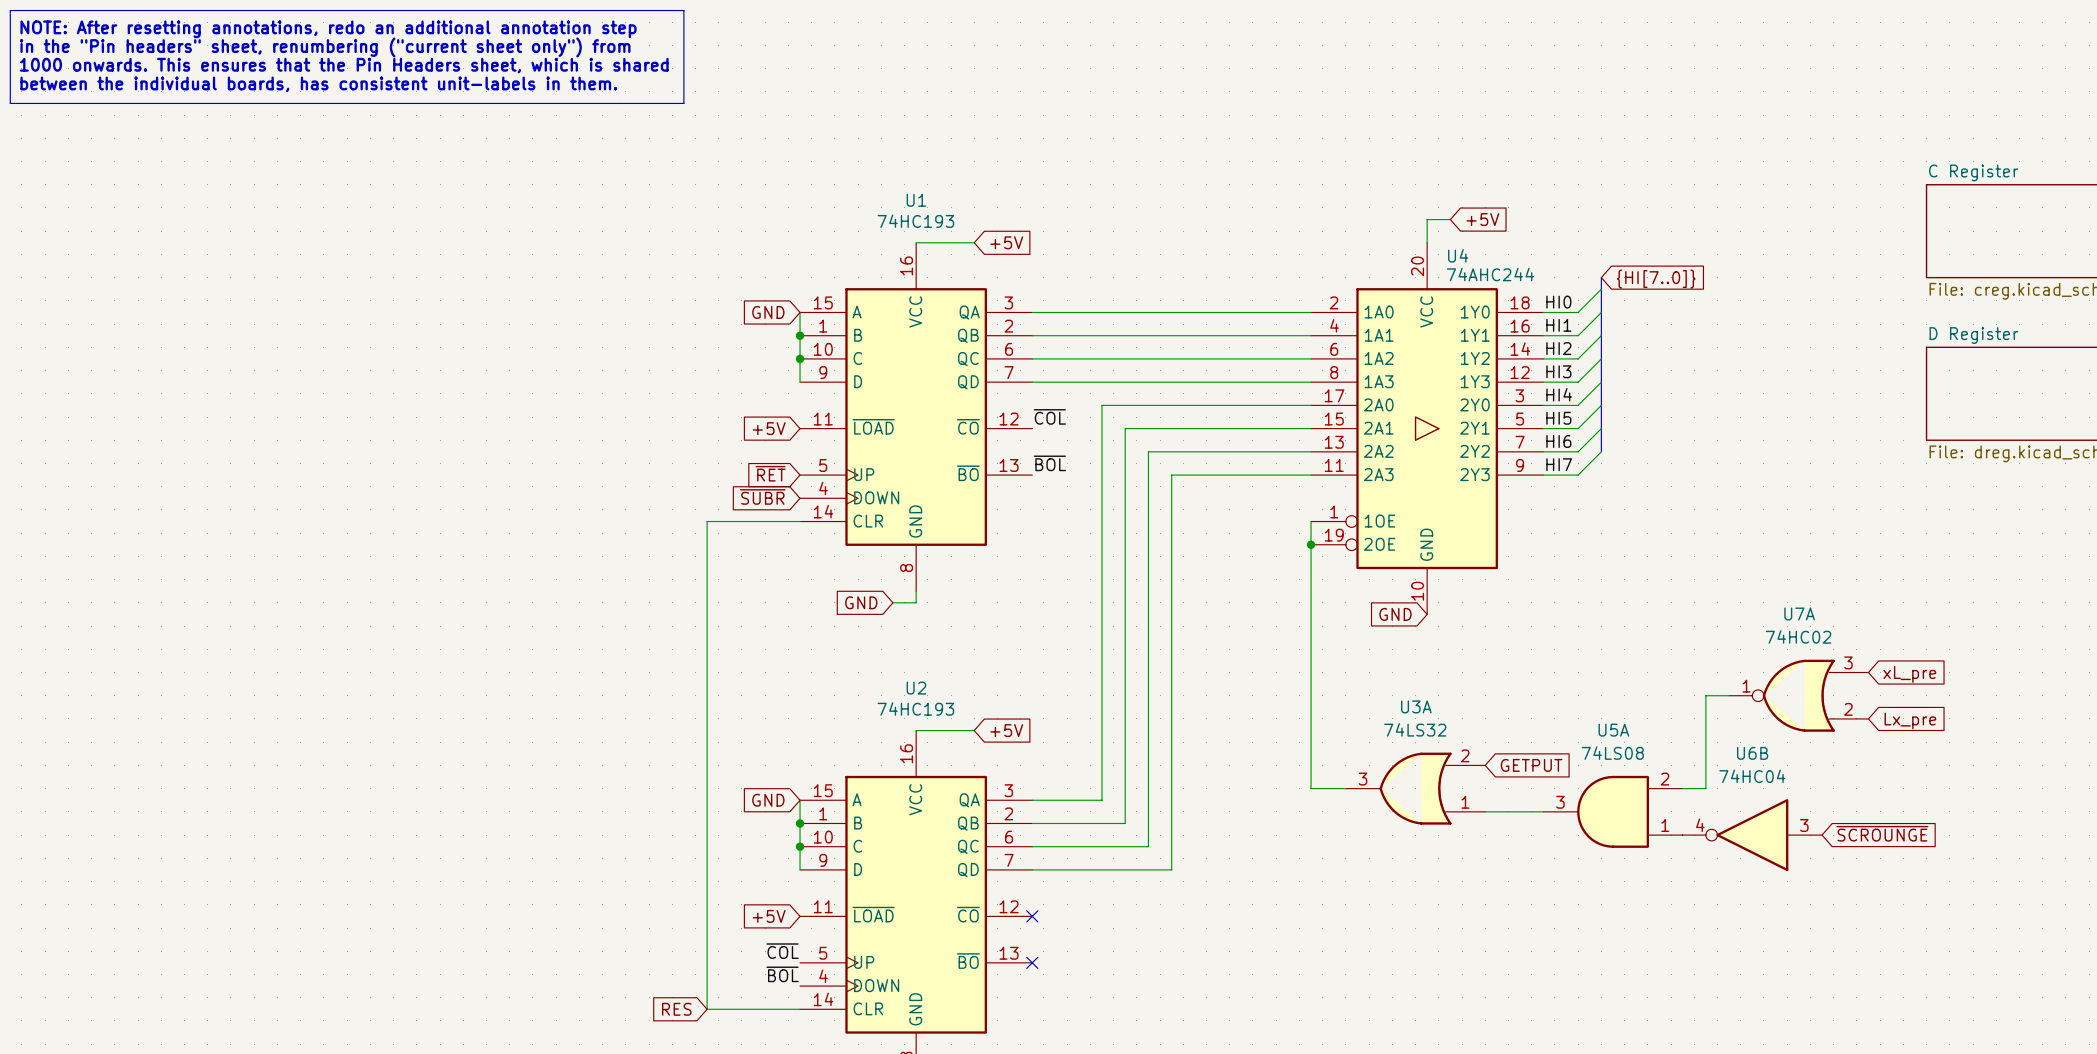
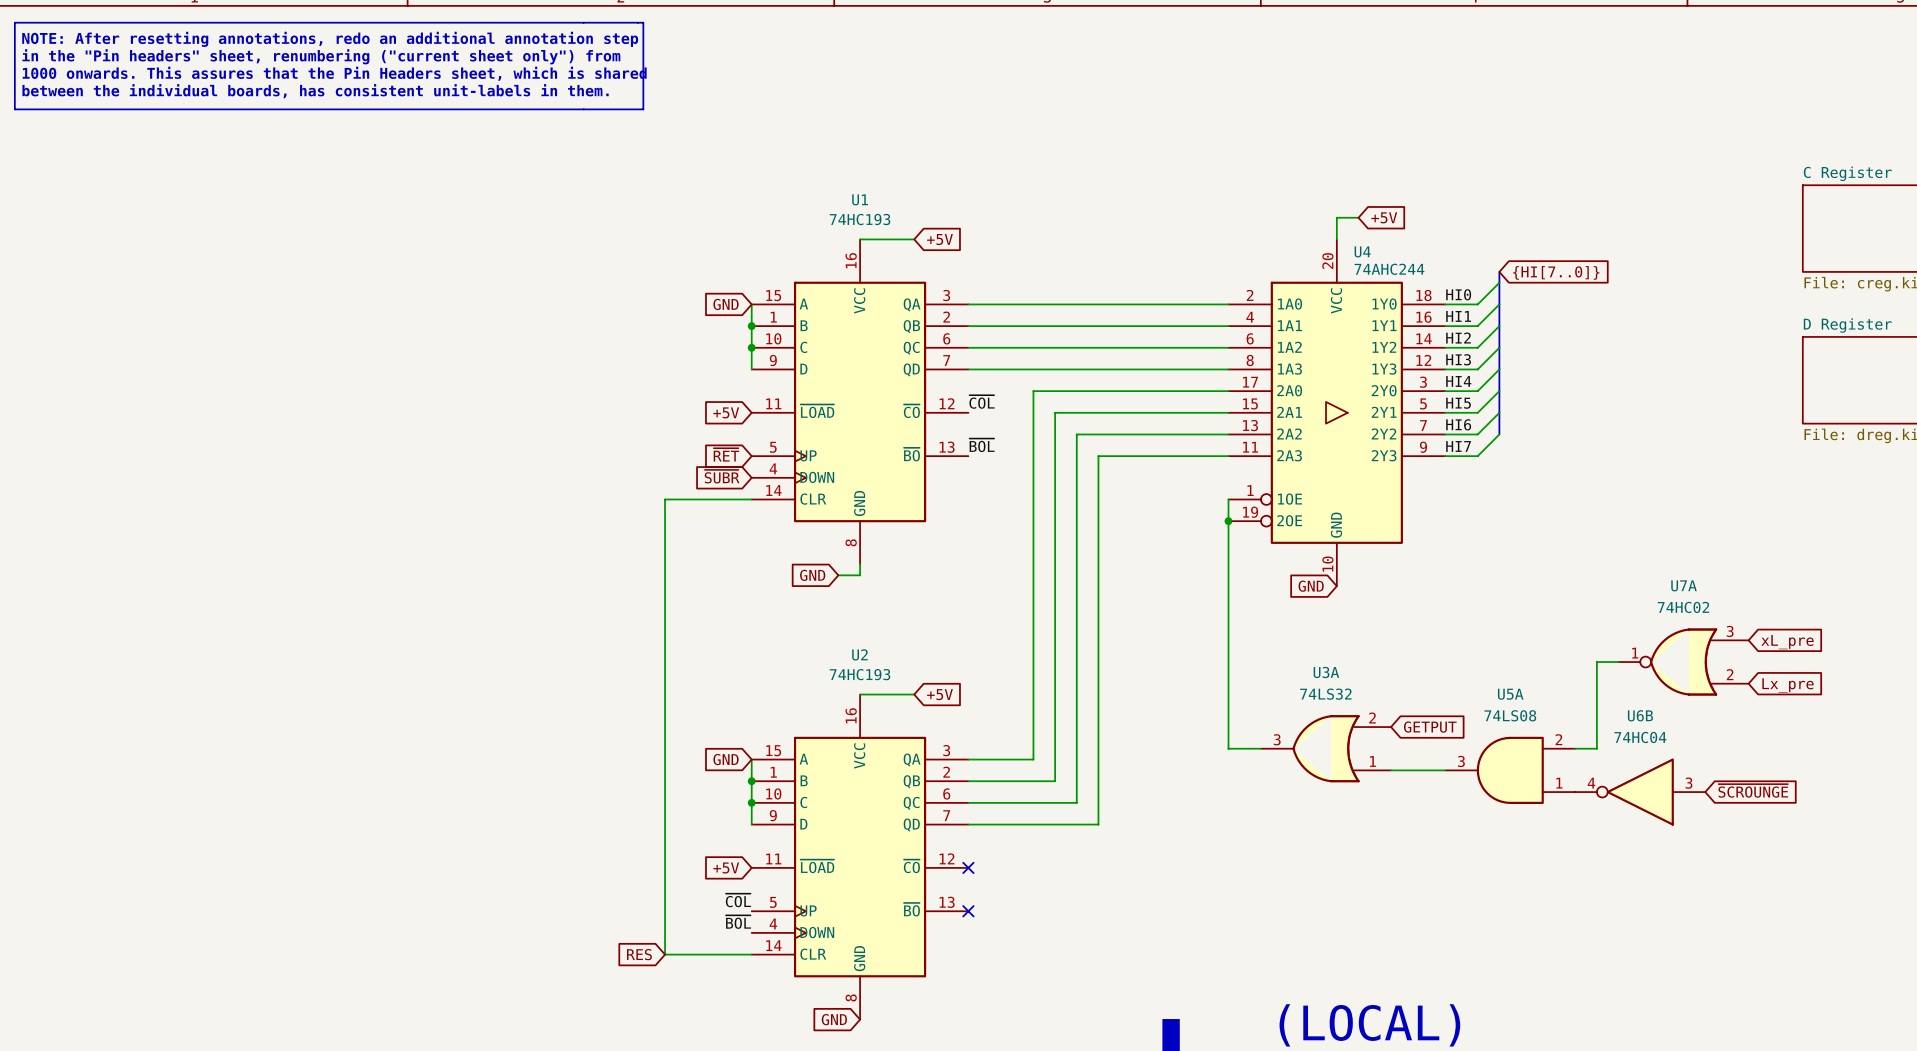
text: 1000 onwards. This ensures that the Pin Headers sheet, which is shared (344, 65) -> 1000 onwards. This assures that the Pin Headers sheet, which is shared (334, 73)

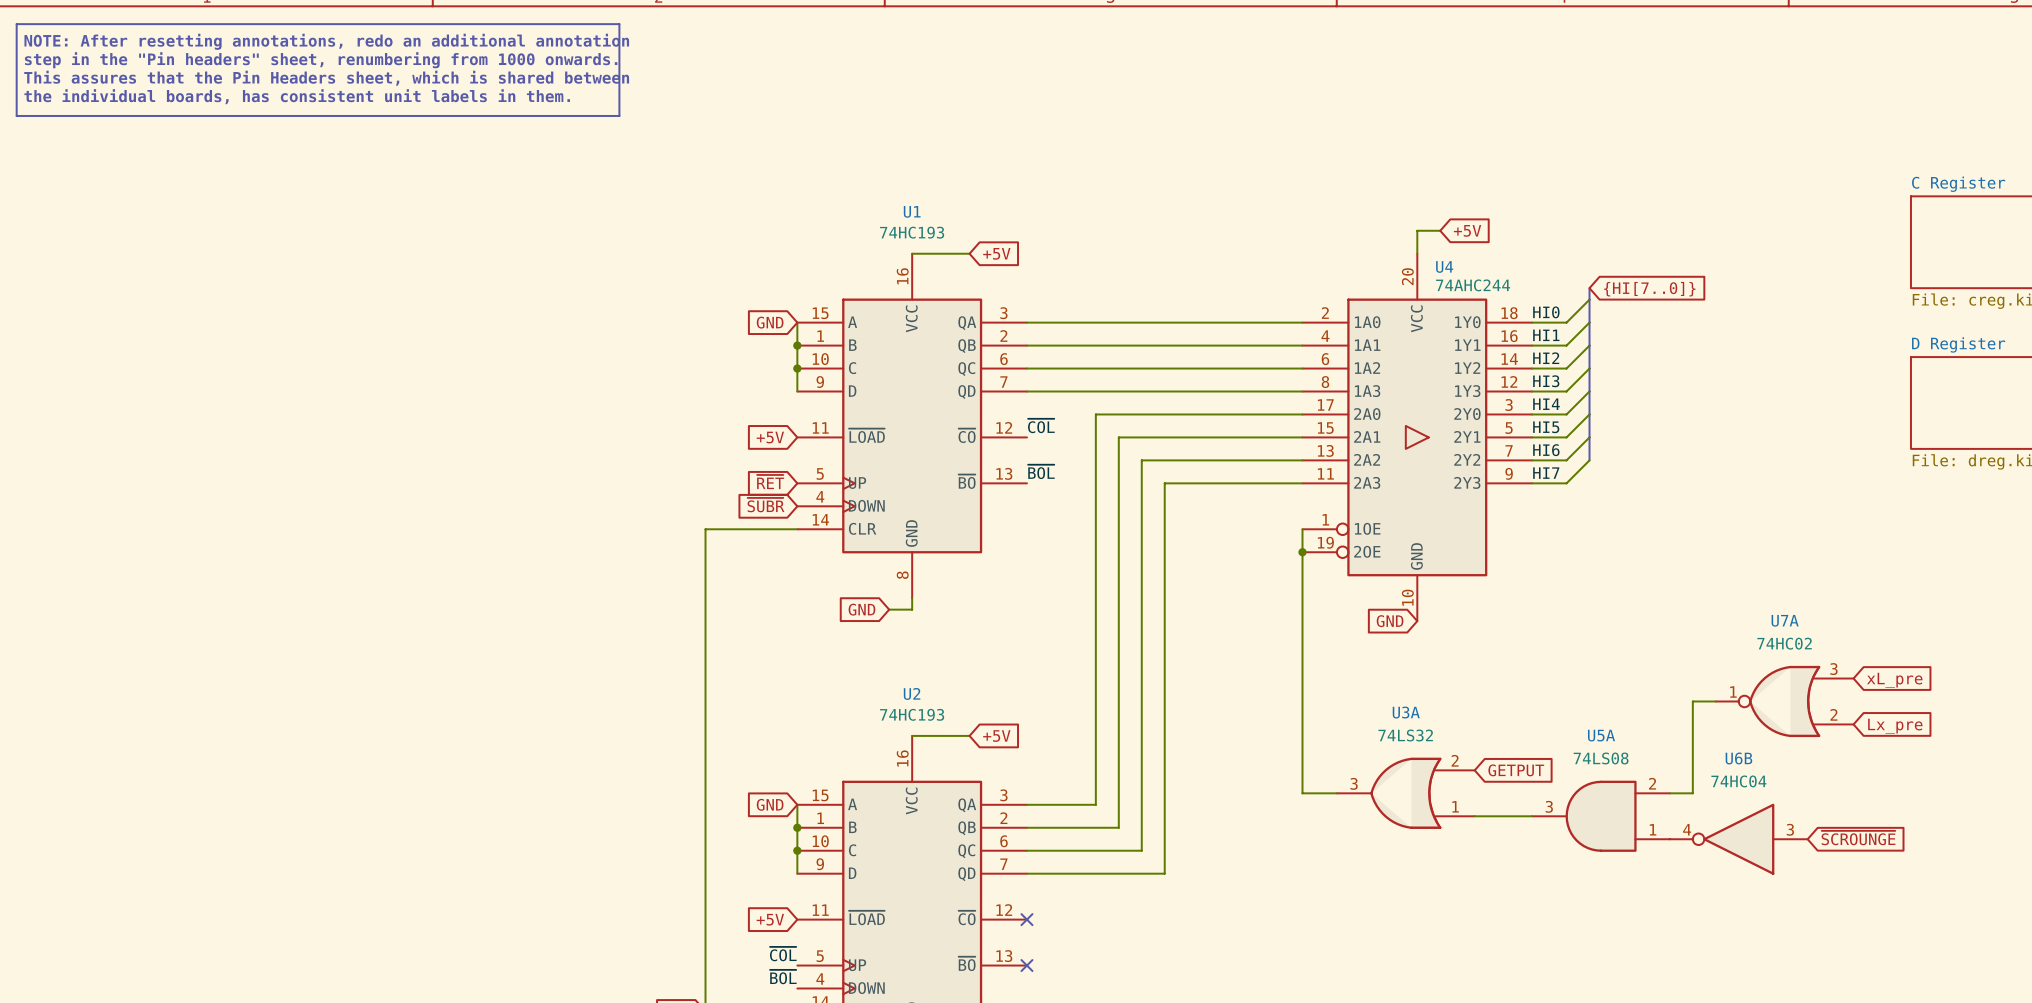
line: (583, 22) (643, 22) (643, 109) (583, 109) -> (619, 24) (619, 115)
text: NOTE: After resetting annotations, redo an additional annotation step (330, 39) -> NOTE: After resetting annotations, redo an additional annotation (326, 41)
text: in the "Pin headers" sheet, renumbering ("current sheet only") from (321, 56) -> step in the "Pin headers" sheet, renumbering from 1000 onwards. (321, 60)
text: 1000 onwards. This assures that the Pin Headers sheet, which is shared (334, 73) -> This assures that the Pin Headers sheet, which is shared between (326, 78)
text: between the individual boards, has consistent unit-labels in them. (315, 91) -> the individual boards, has consistent unit labels in them. (297, 96)

